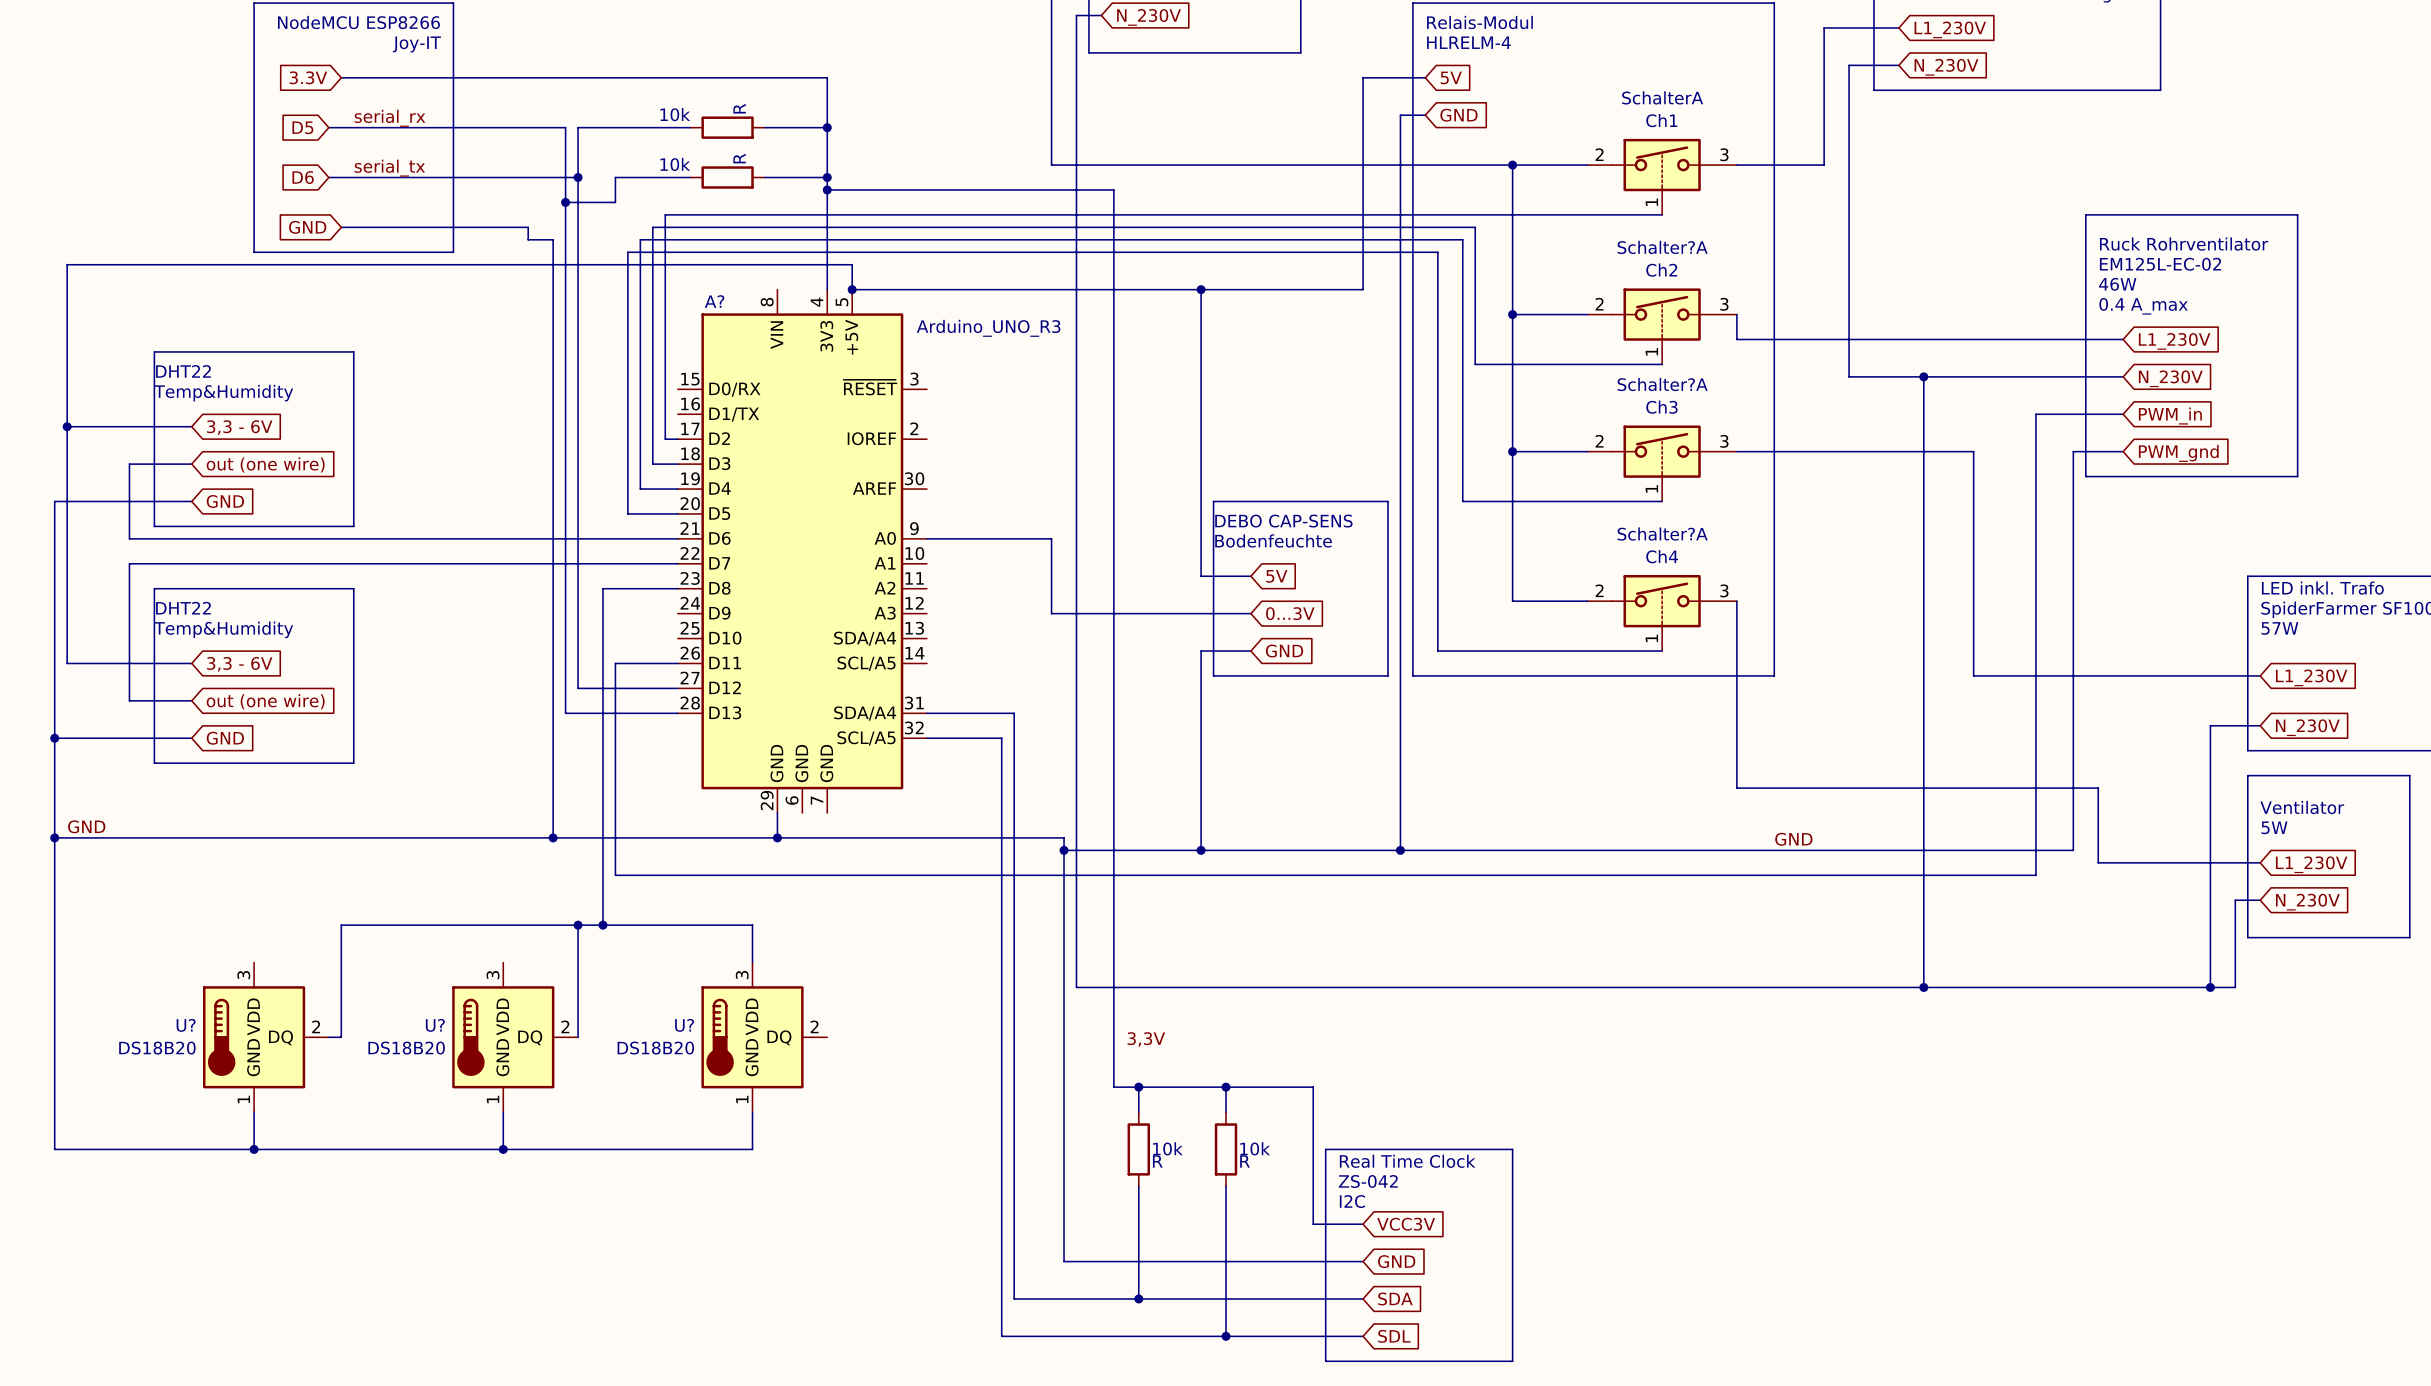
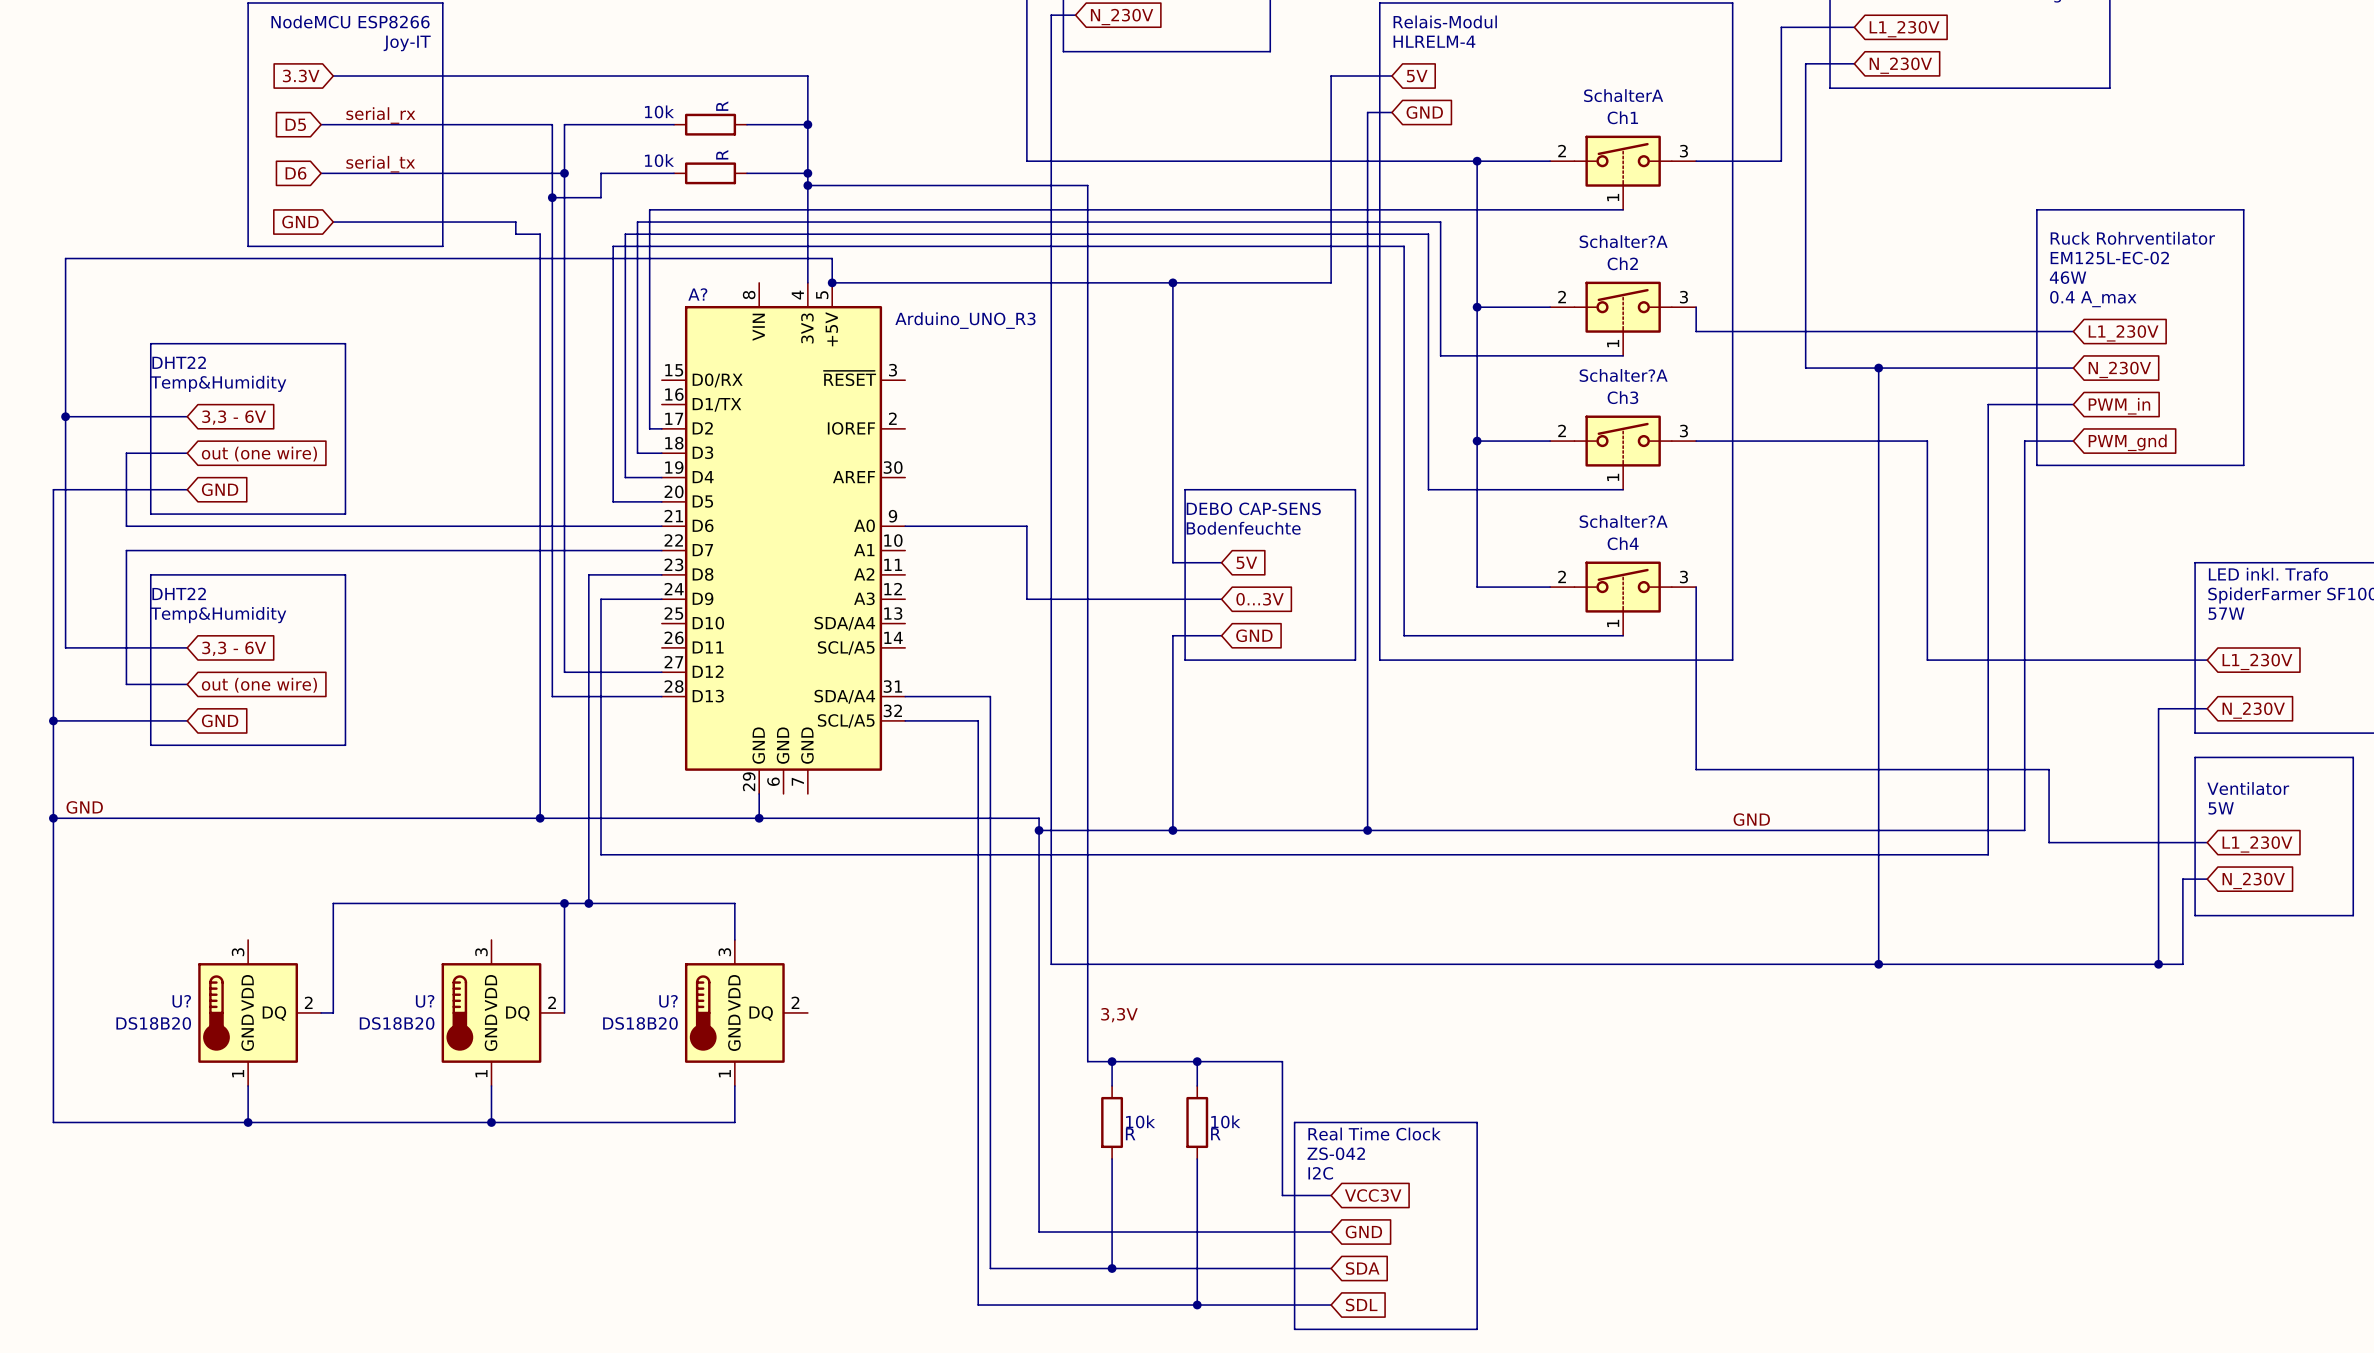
wire: (615, 663) (677, 663) -> (601, 647) (601, 599) (661, 599)

